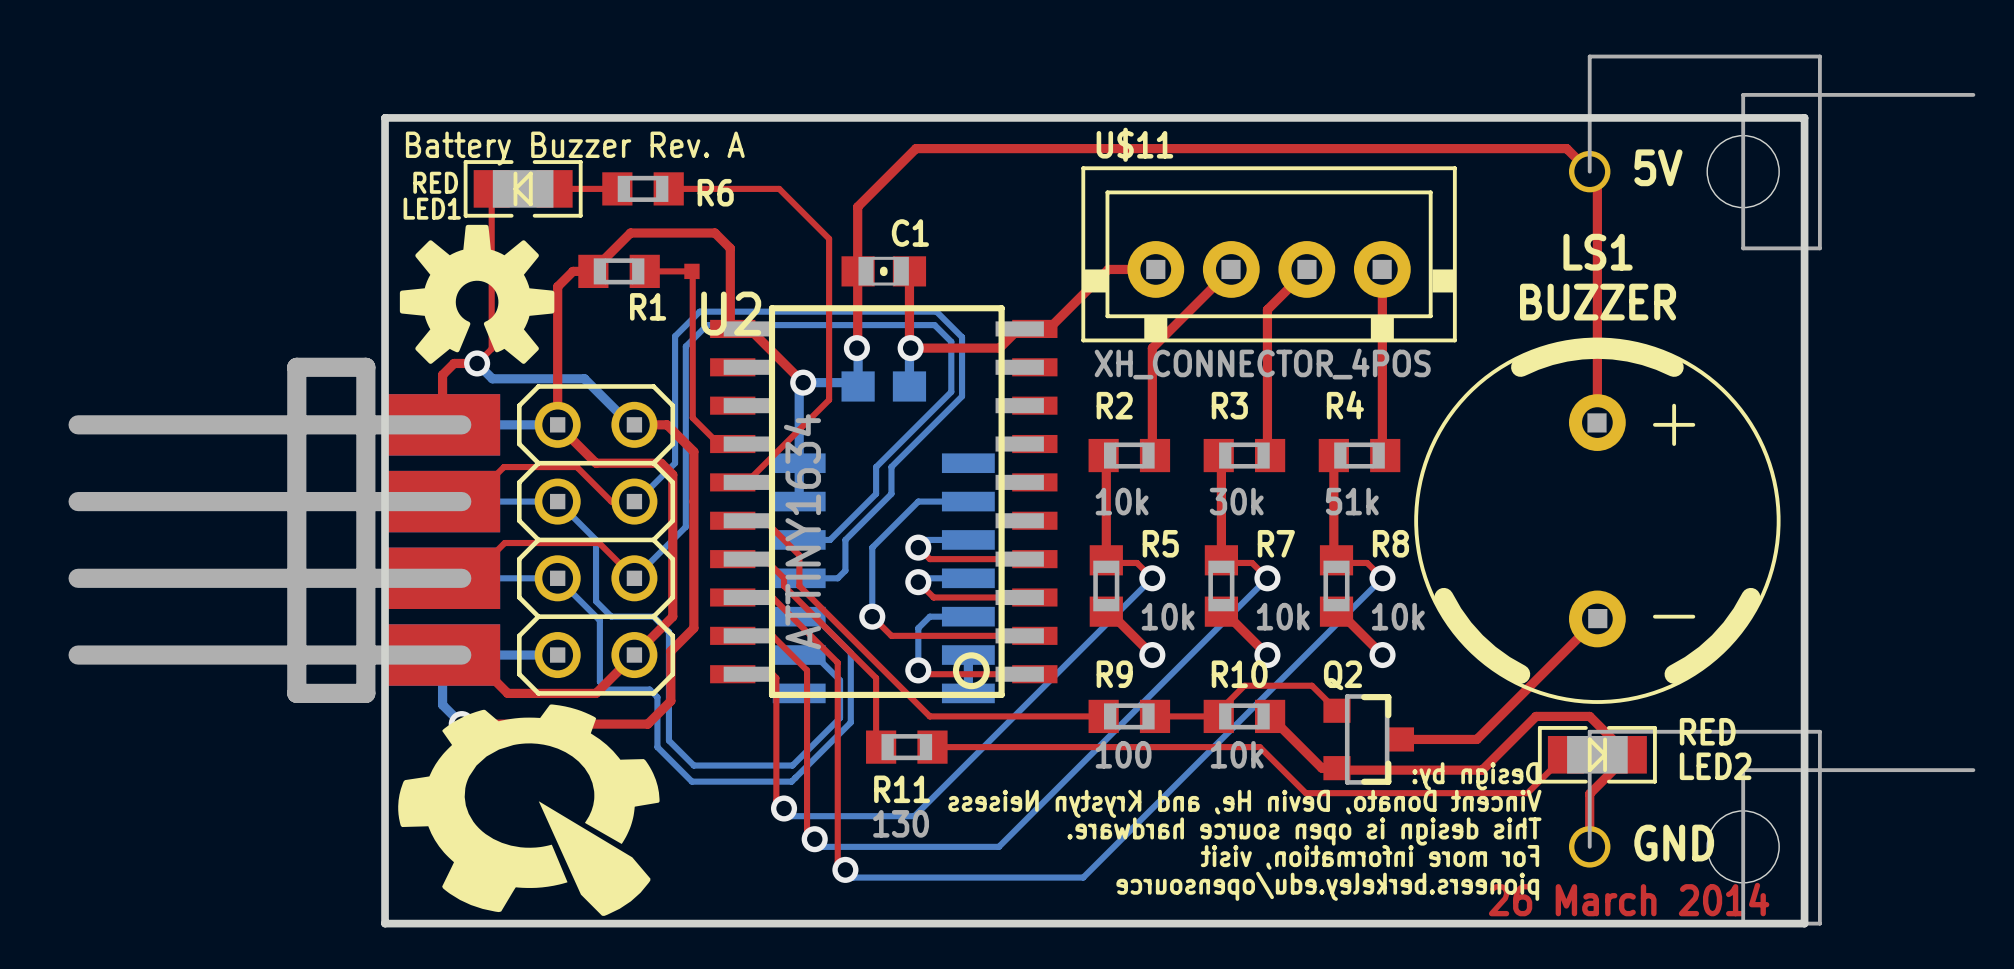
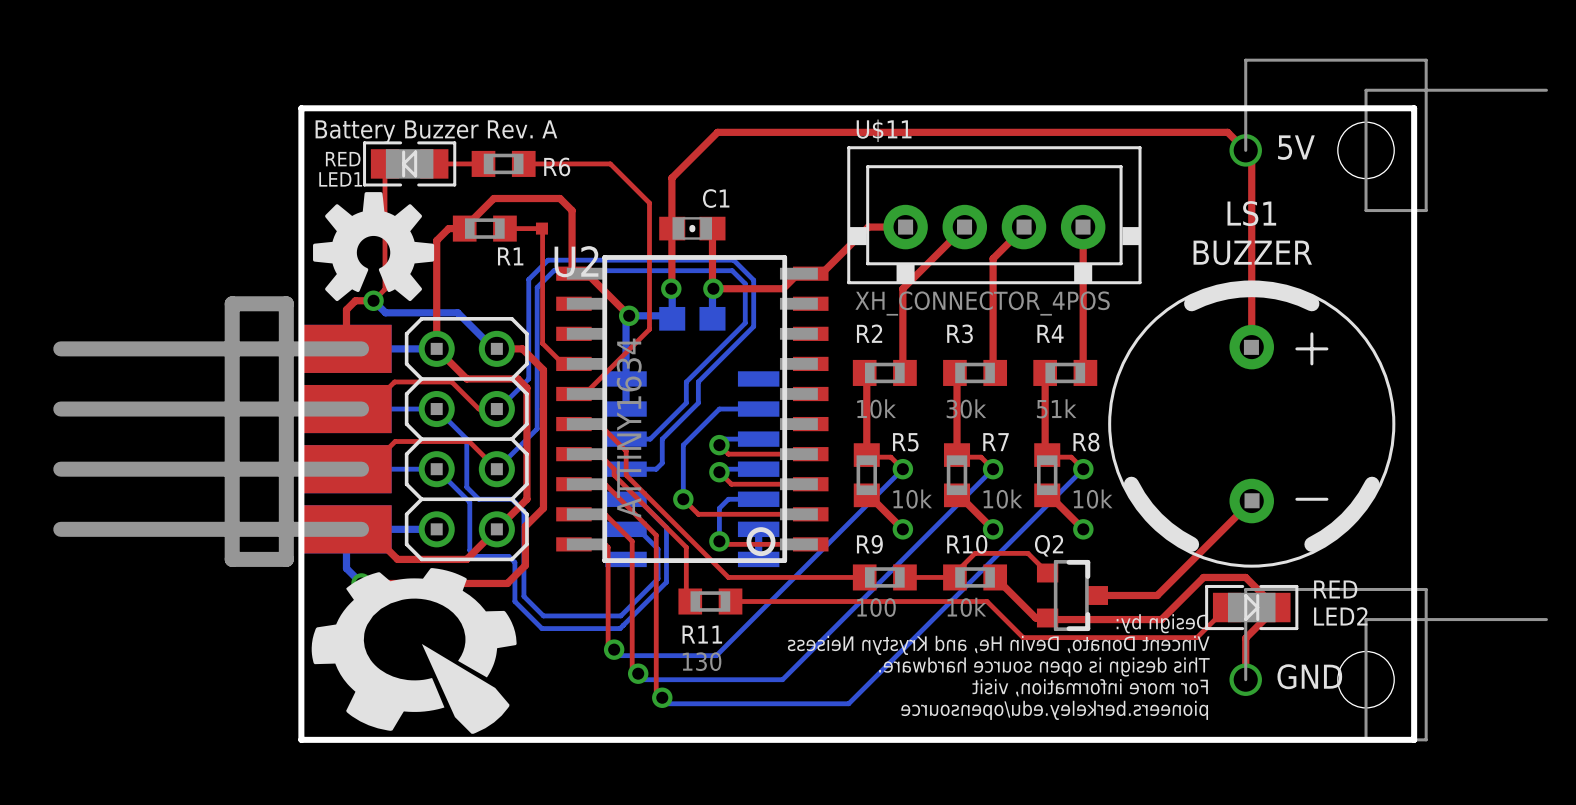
text: 26 March 2014 (1629, 899) -> none

